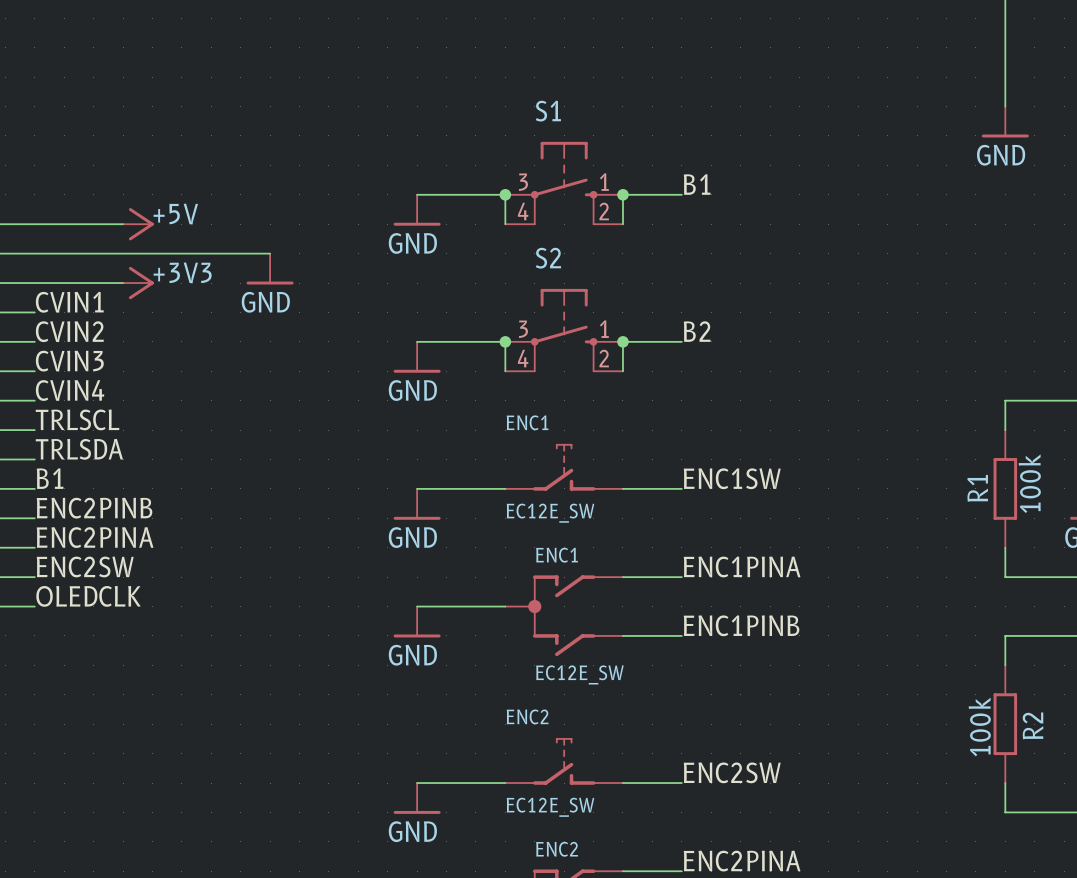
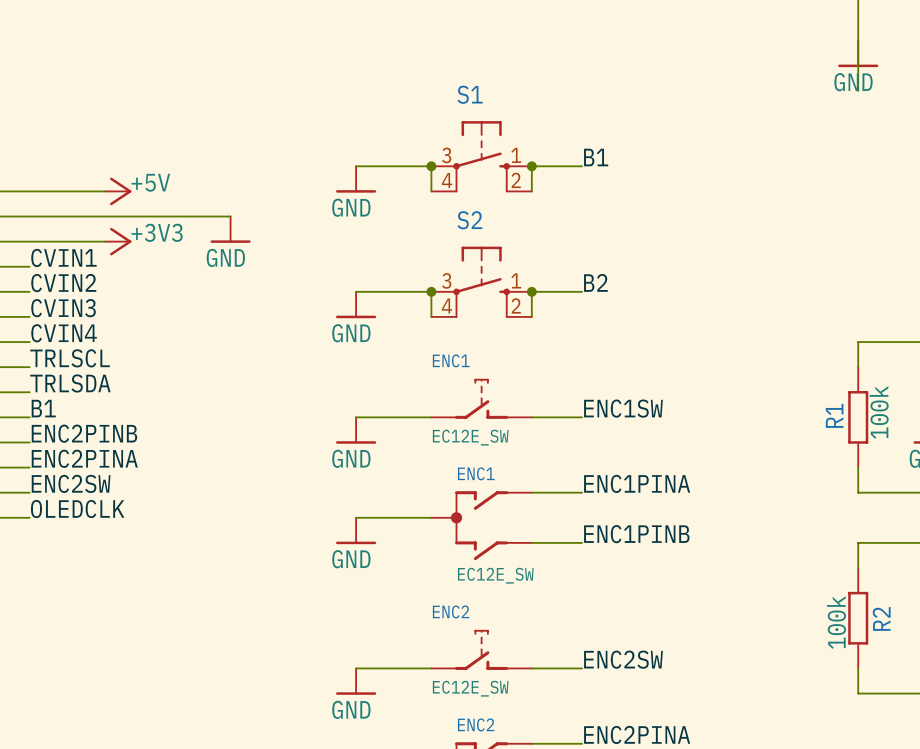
power symbol position: GND (1005, 122) -> GND (858, 53)

